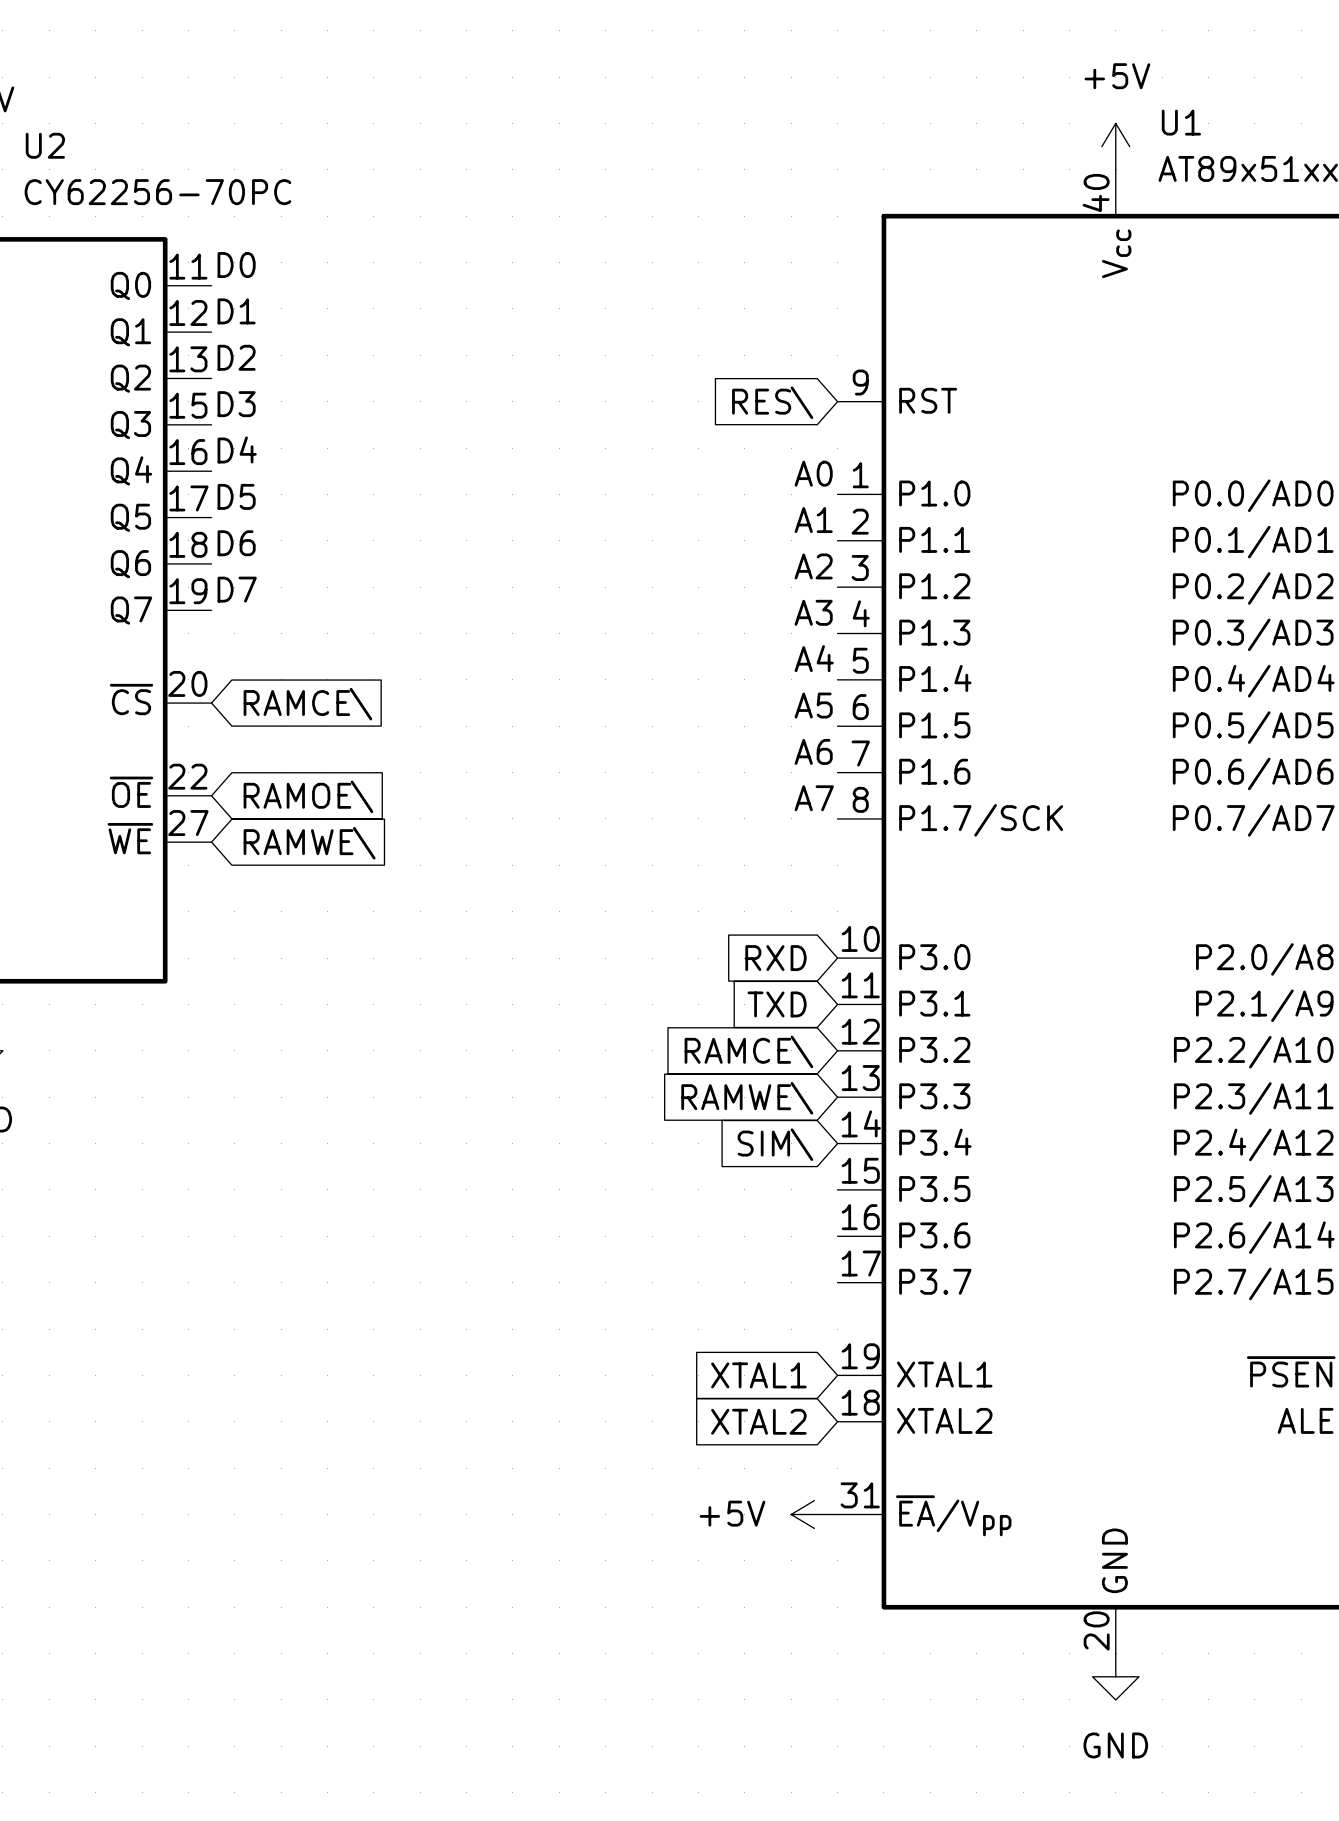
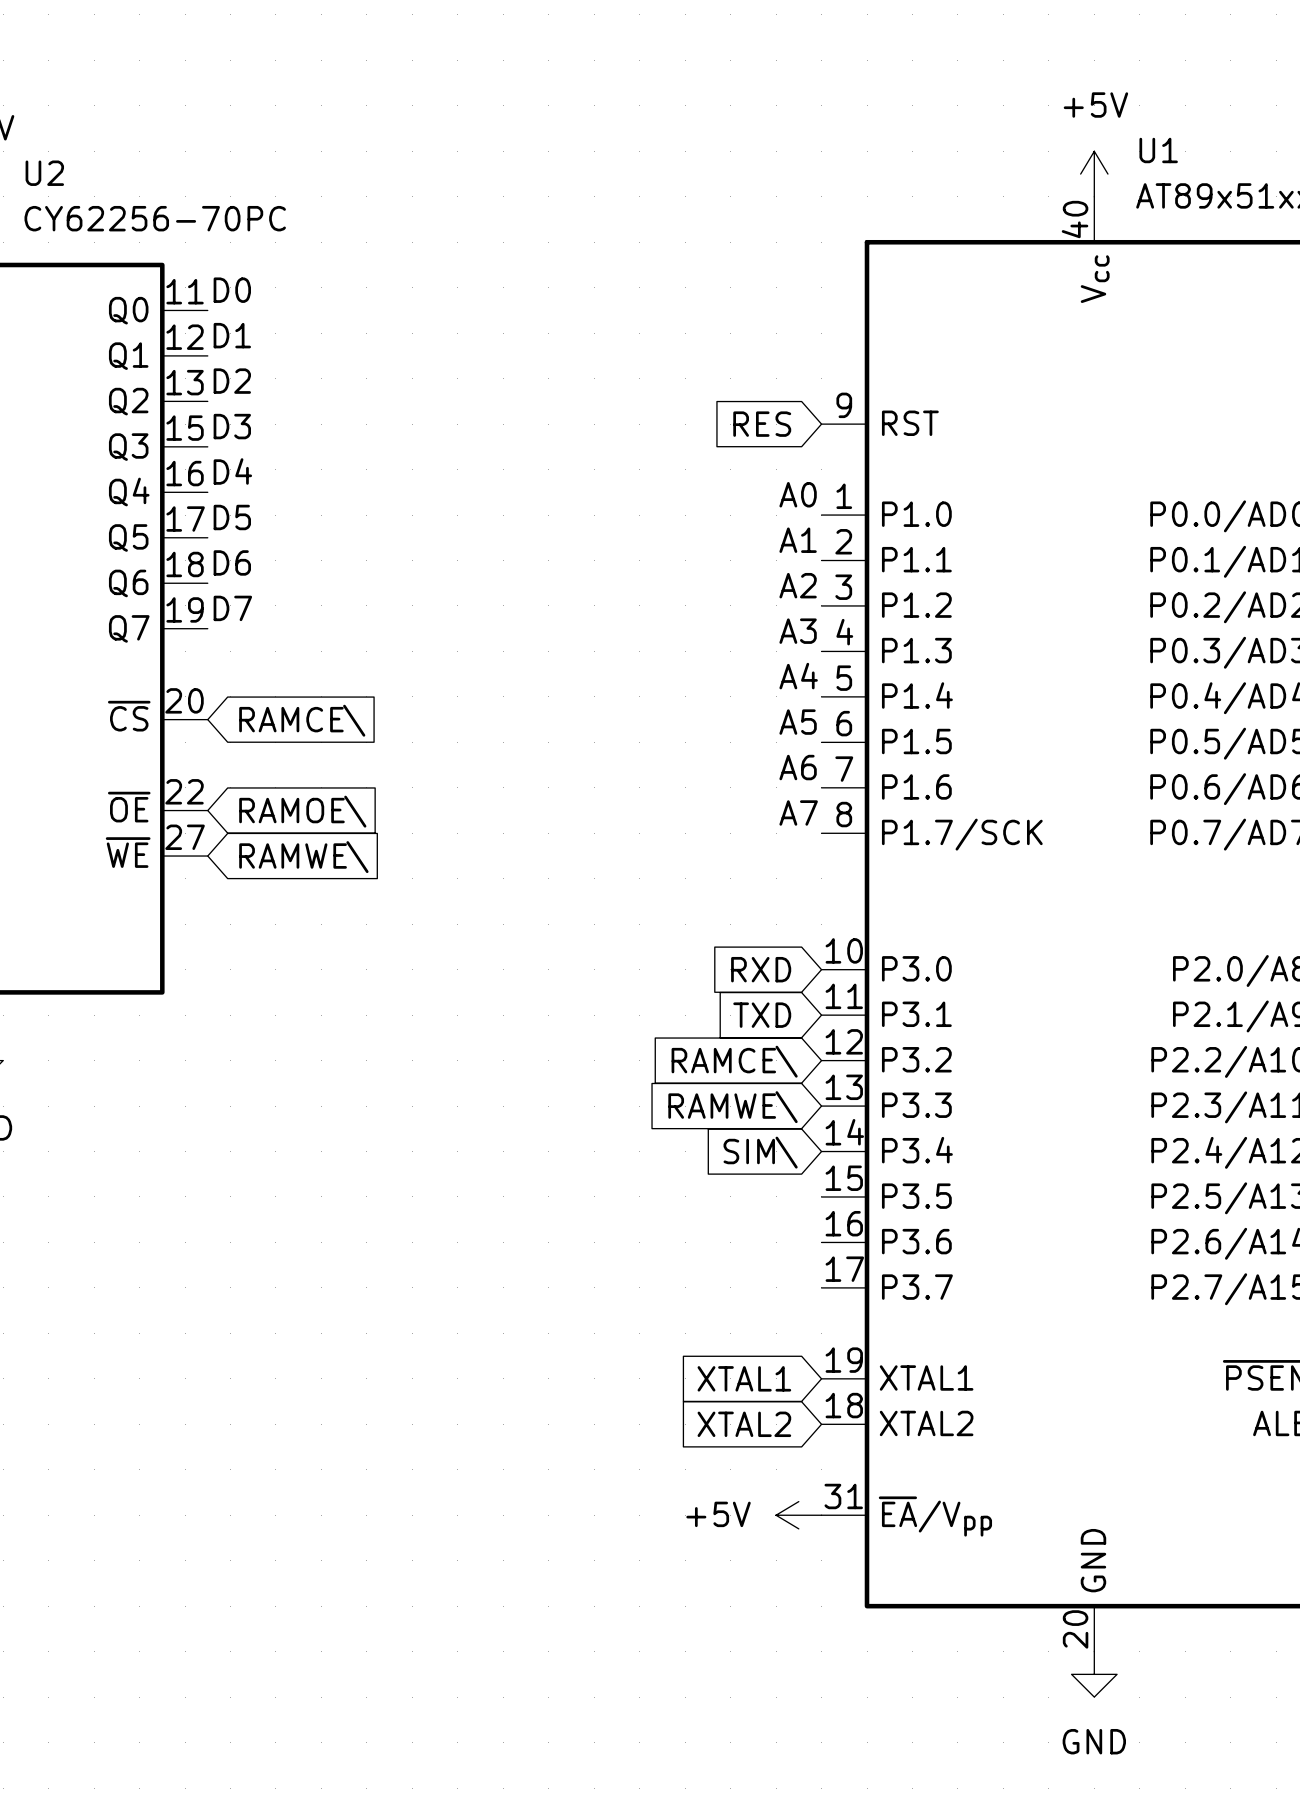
global label: RES\ (772, 402) -> RES (762, 424)

